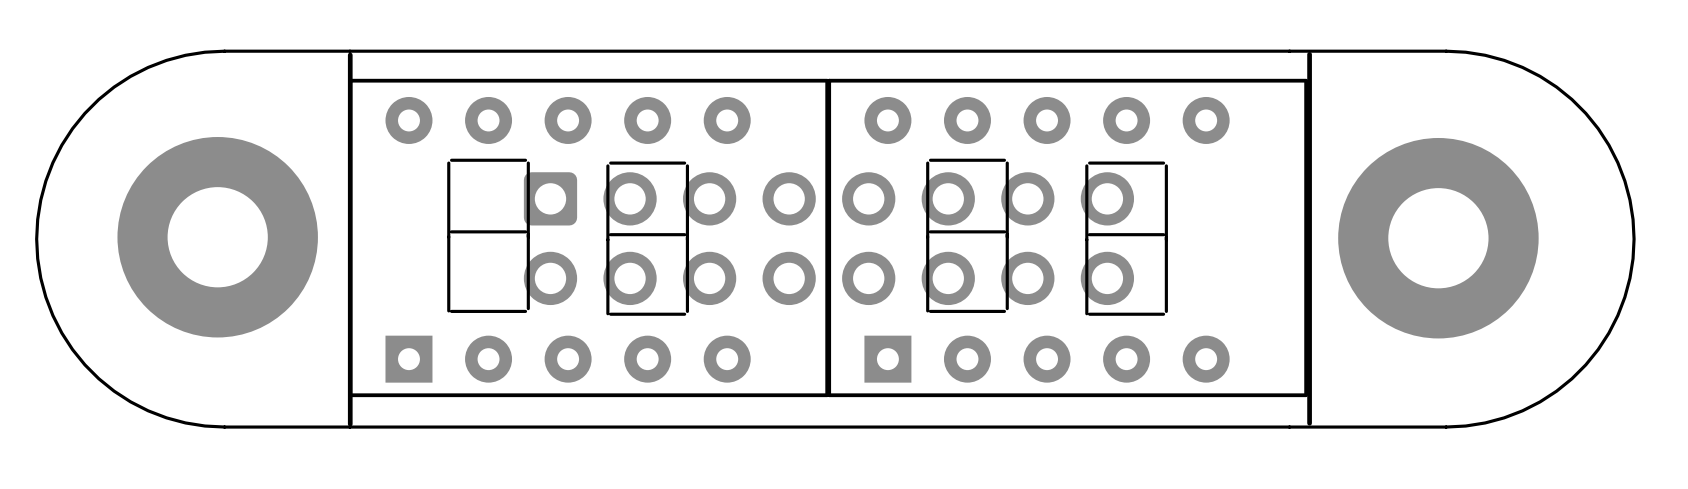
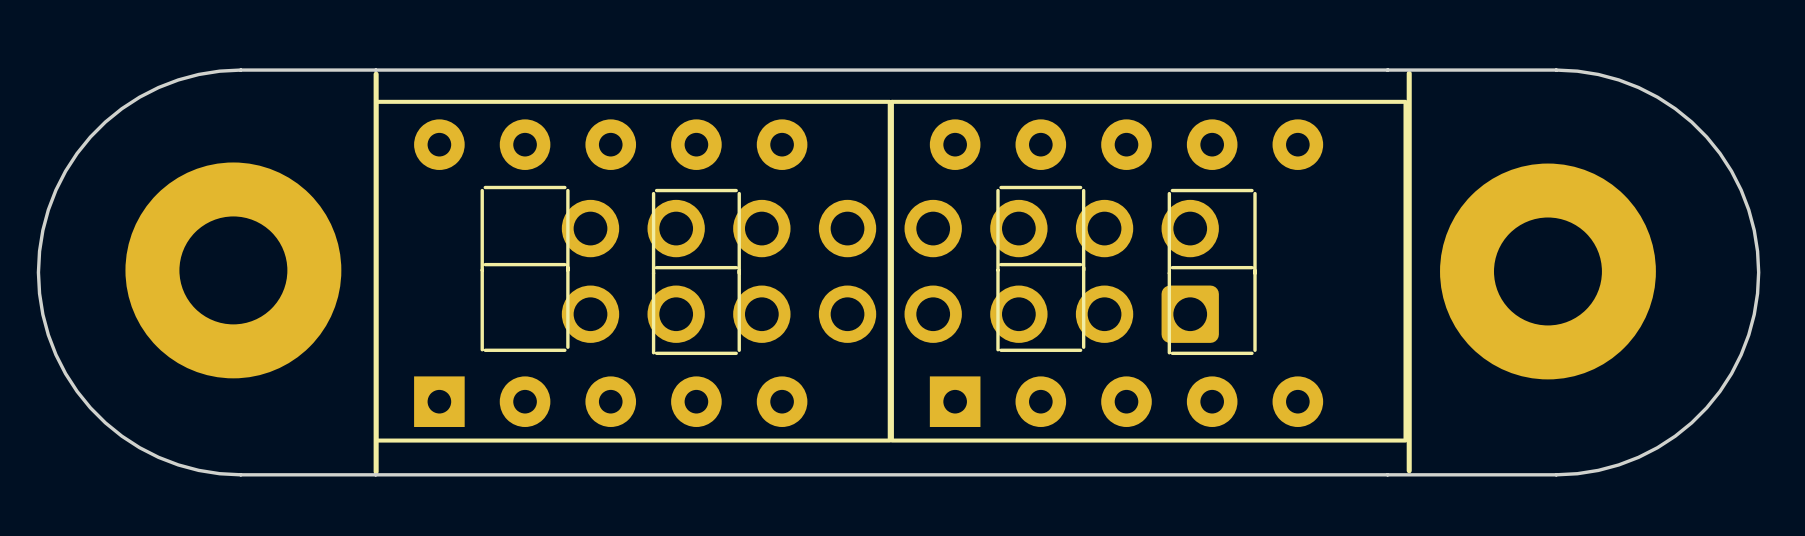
part rotation: 0° (828, 238) -> 180° (890, 271)

